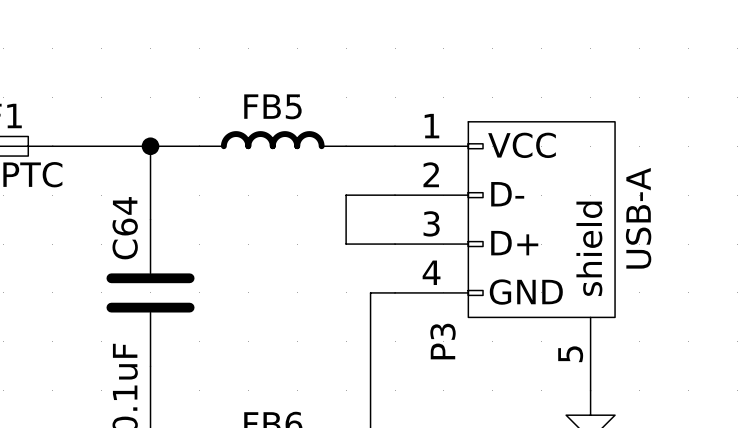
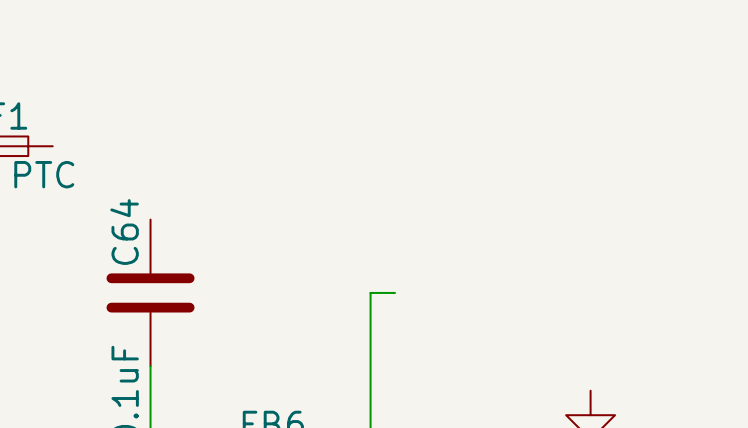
FB5: (272, 140) -> none
wire: (52, 146) (199, 146) -> none
wire: (150, 146) (150, 219) -> none
junction: (150, 146) -> none
wire: (346, 146) (395, 146) -> none
wire: (395, 195) (346, 195) (346, 244) (395, 244) -> none
P3: USB-A (505, 256) -> none

